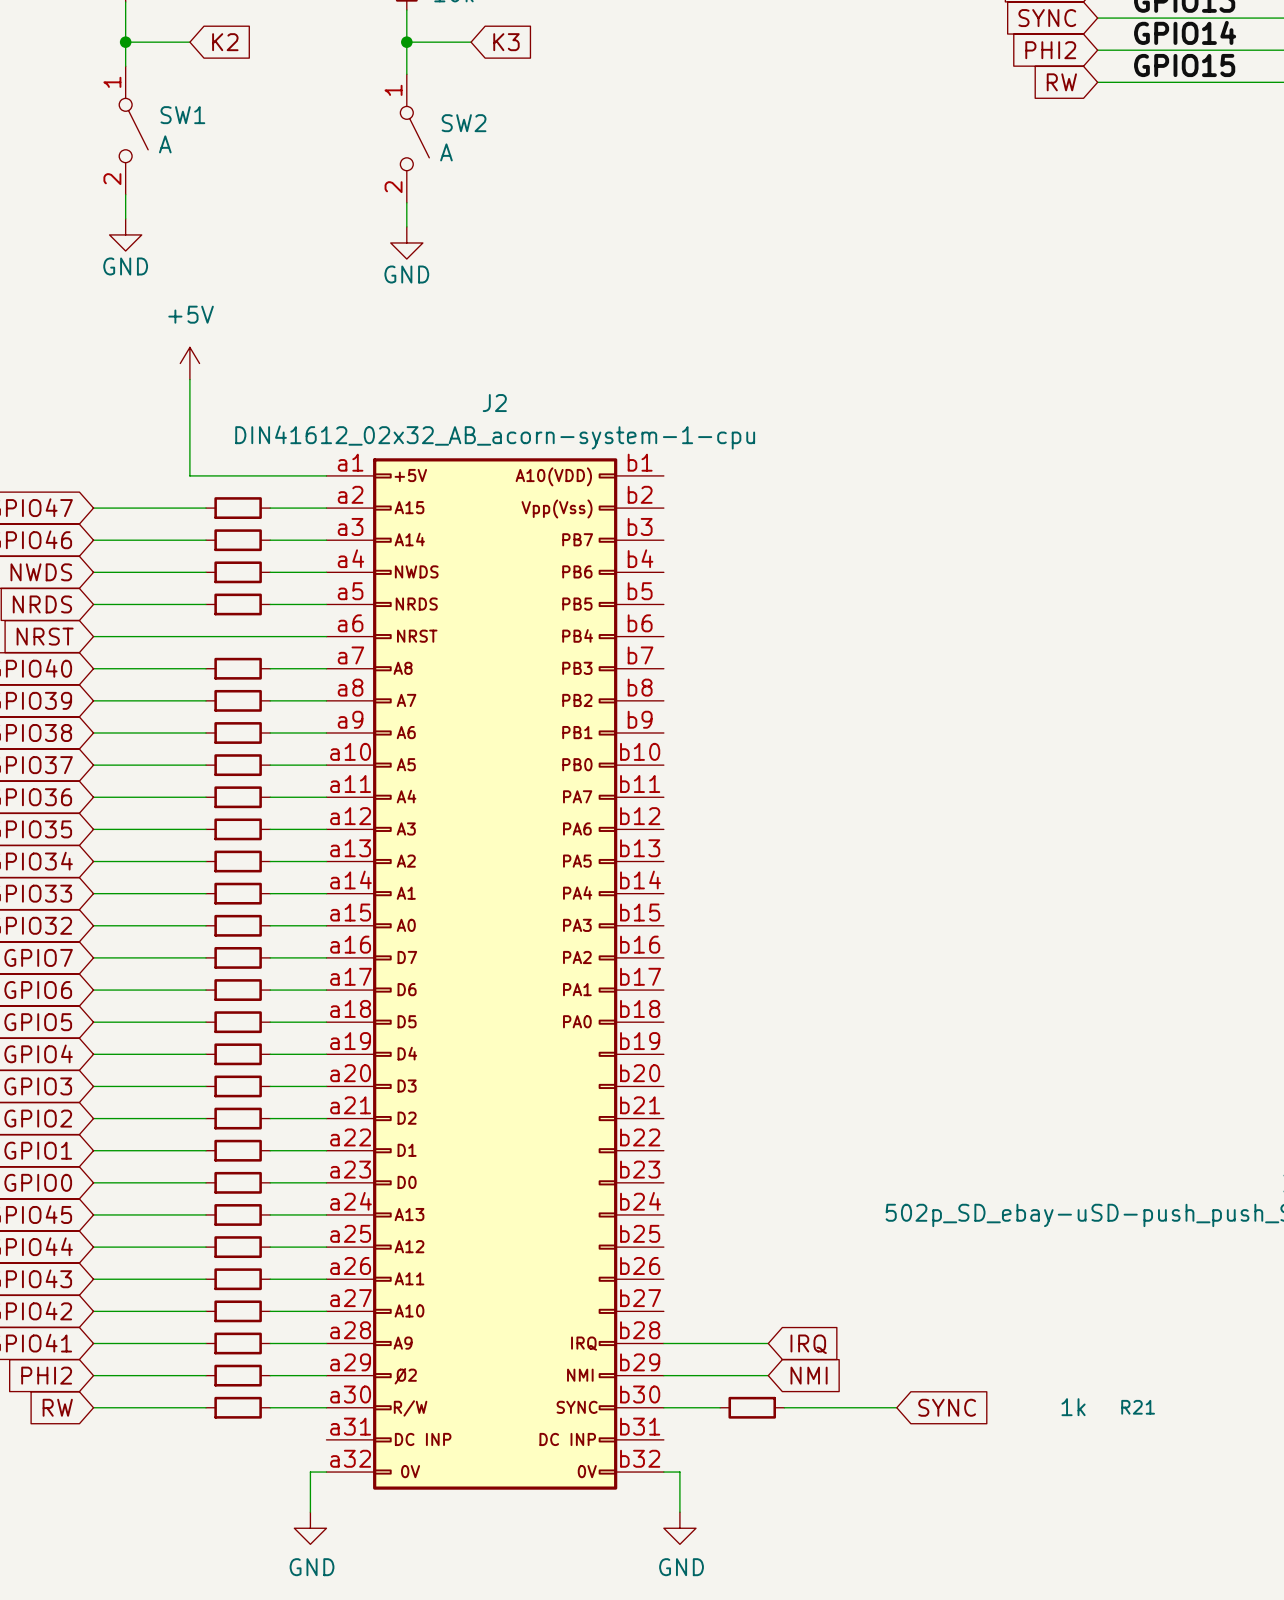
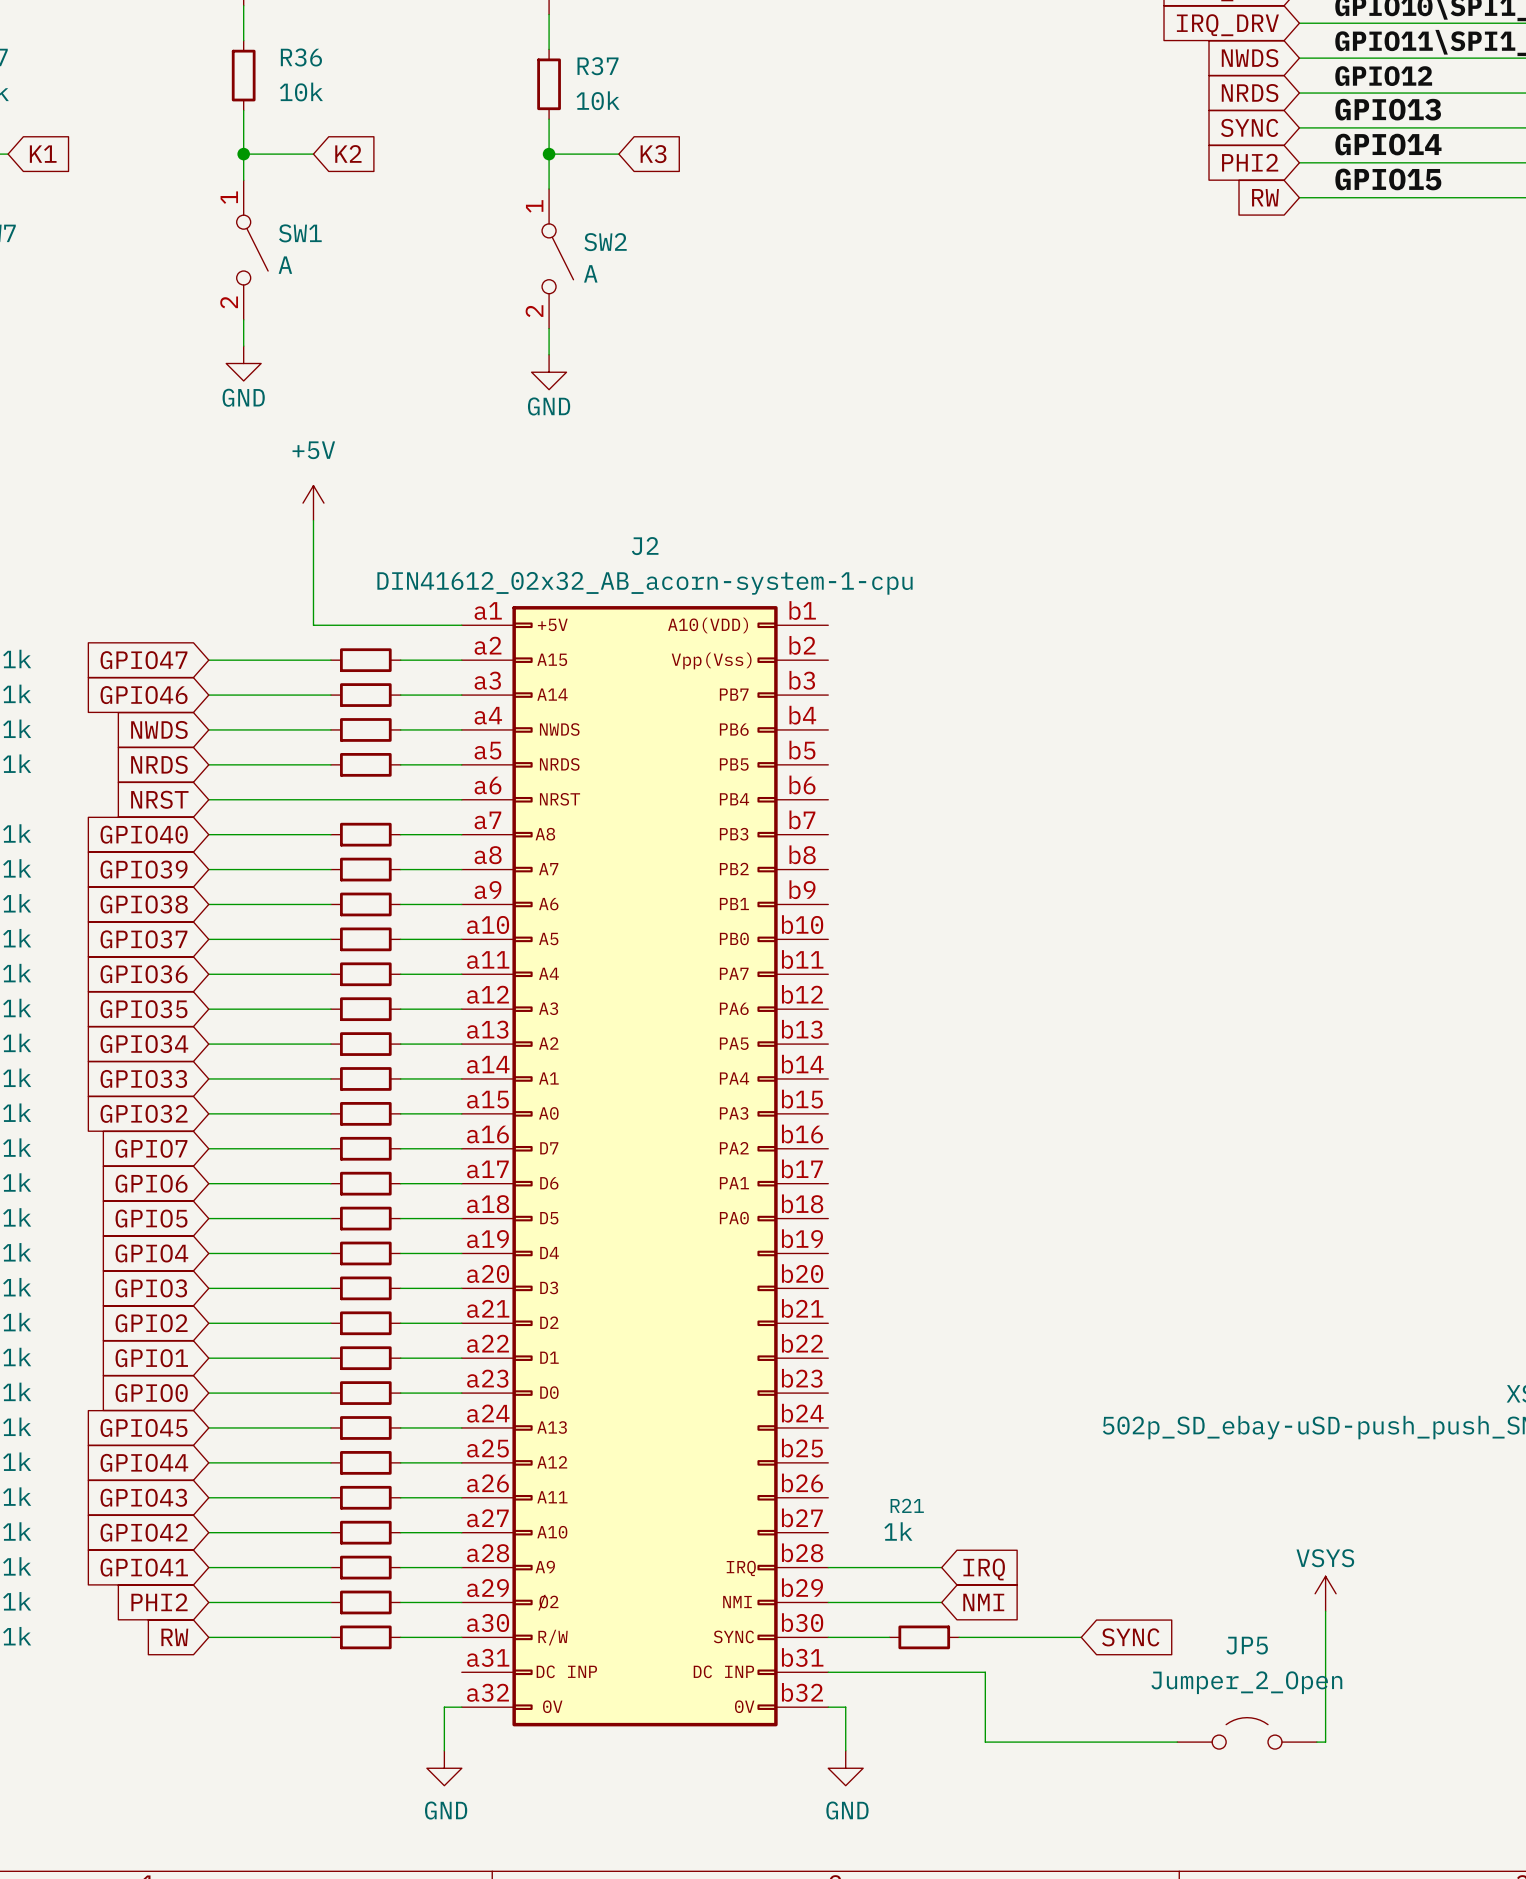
power symbol: none -> VSYS (1325, 1593)
wire: none -> (1325, 1611) (1325, 1742) (1316, 1742)
R21 value position: 1k (1073, 1407) -> 1k (898, 1531)
R21 name position: R21 (1138, 1407) -> R21 (907, 1505)
wire: none -> (828, 1672) (985, 1672) (985, 1742) (1177, 1742)
JP5: none -> Jumper_2_Open (1247, 1733)

